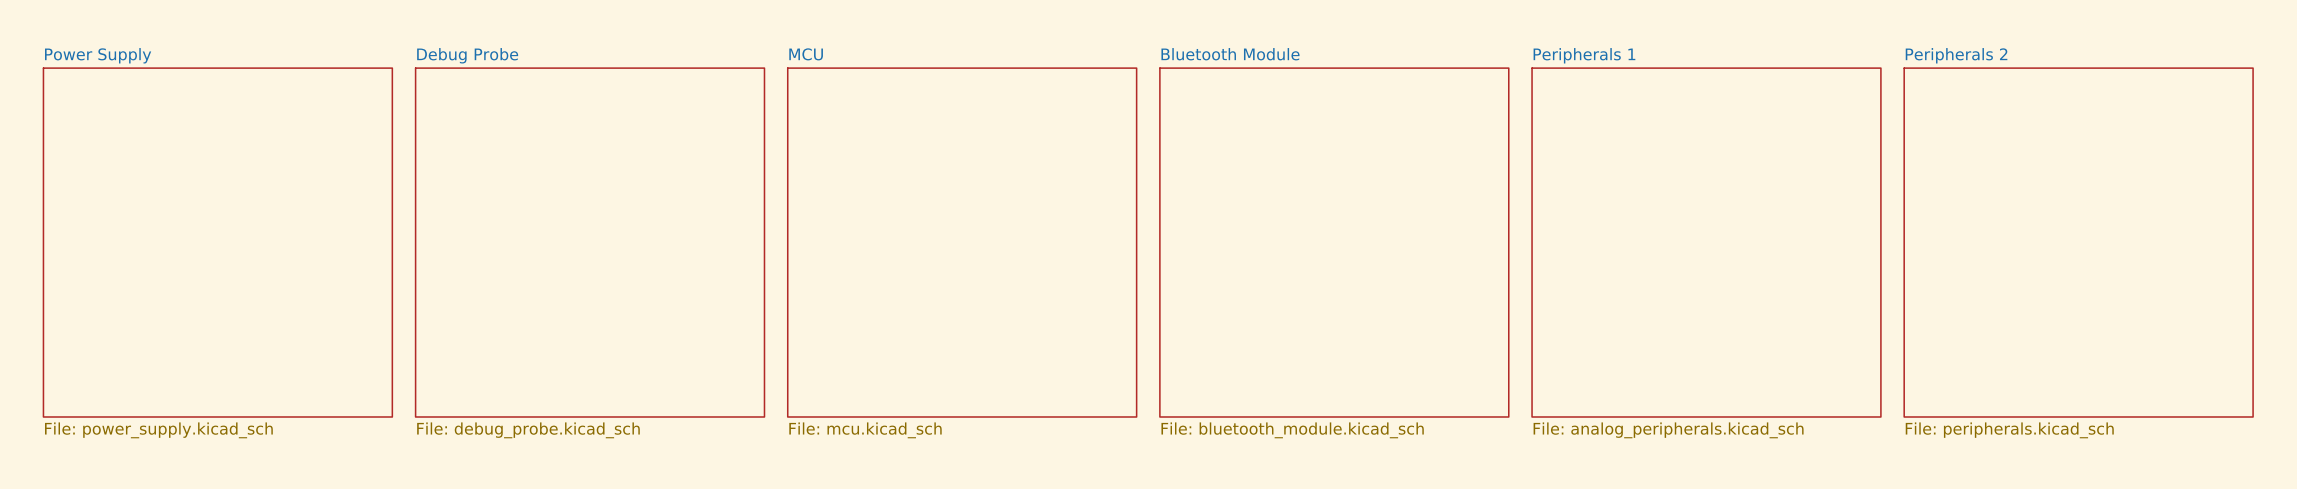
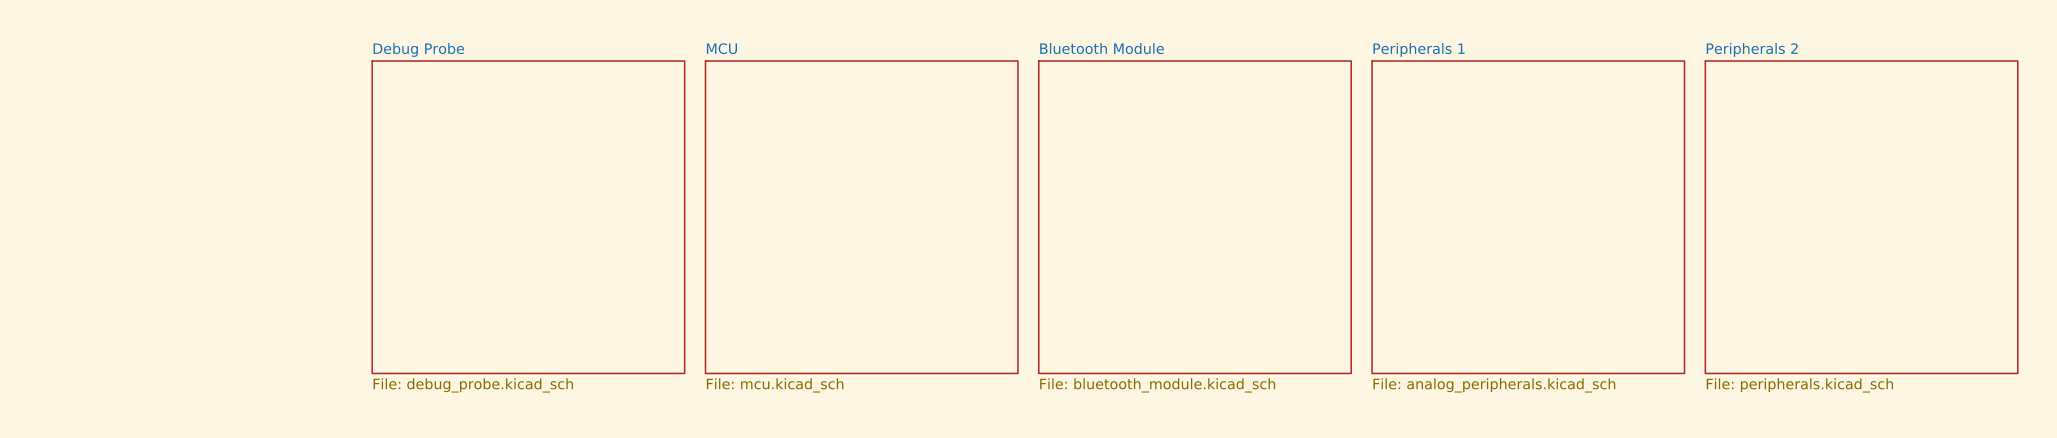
sheet Power Supply: File: power_supply.kicad_sch (217, 242) -> none

